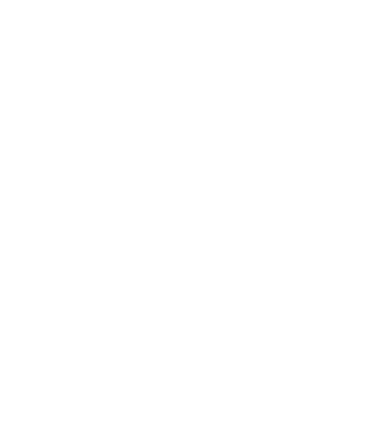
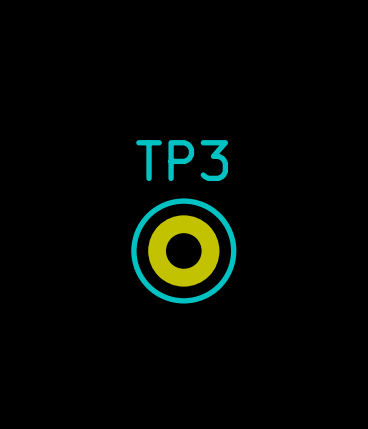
TP3: none -> (183, 250)

